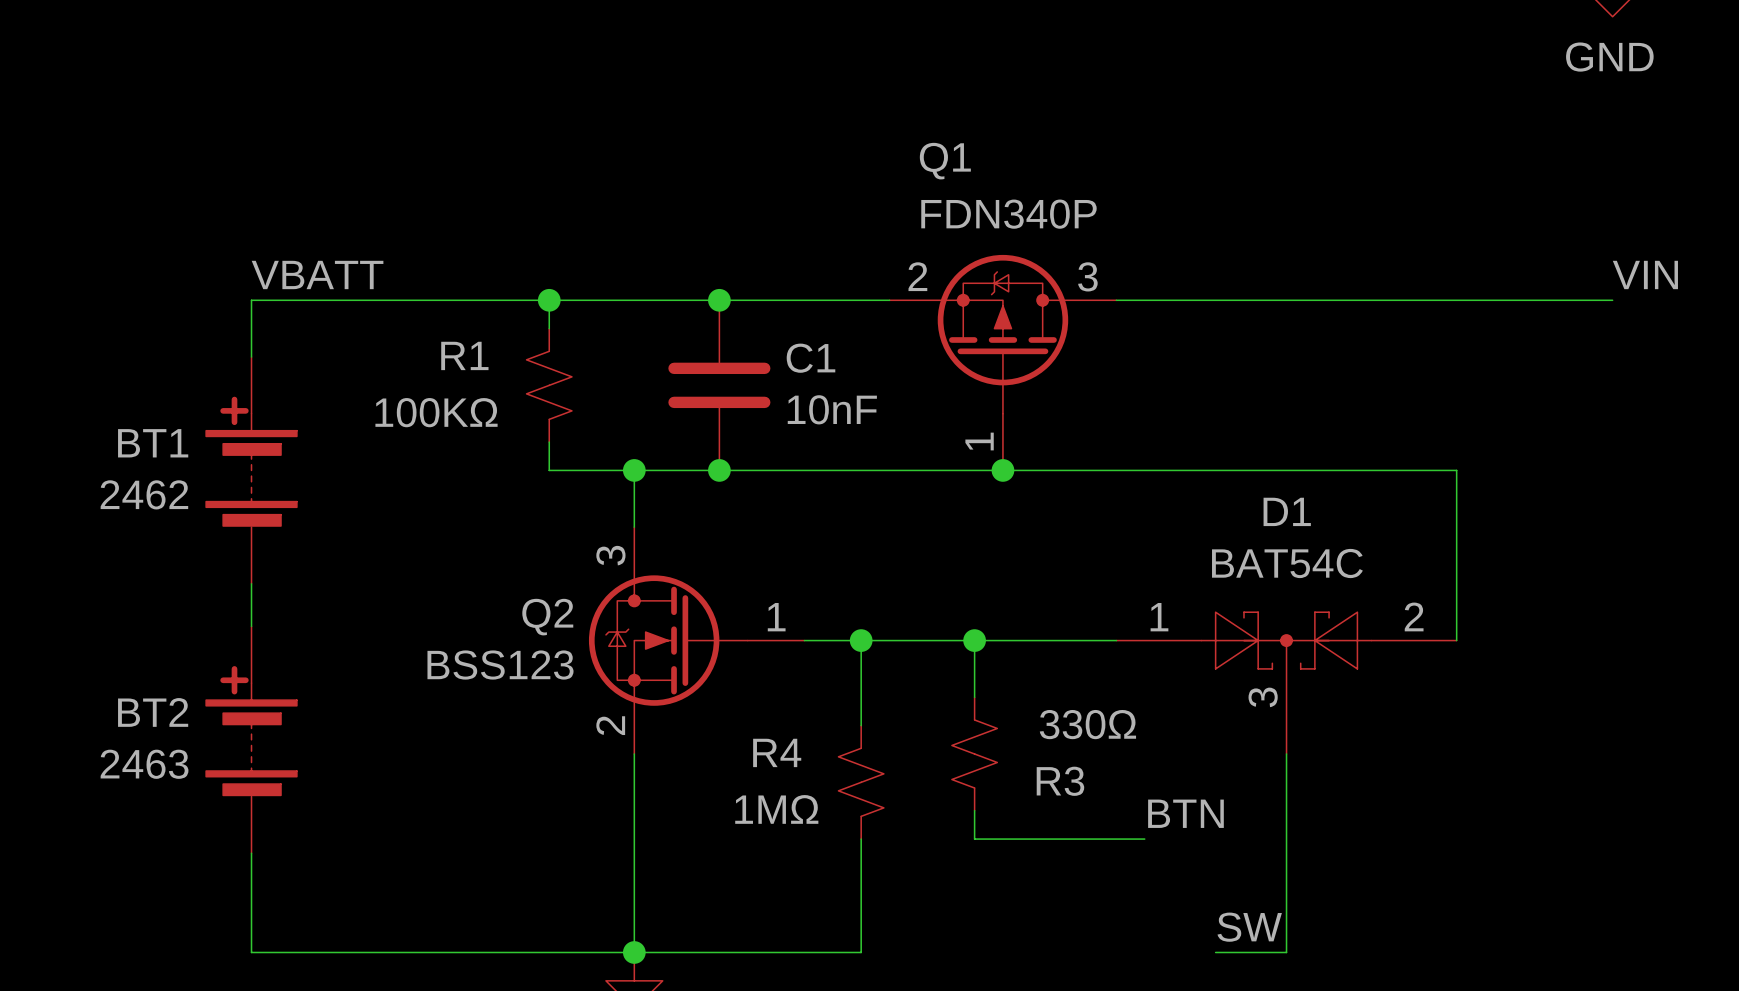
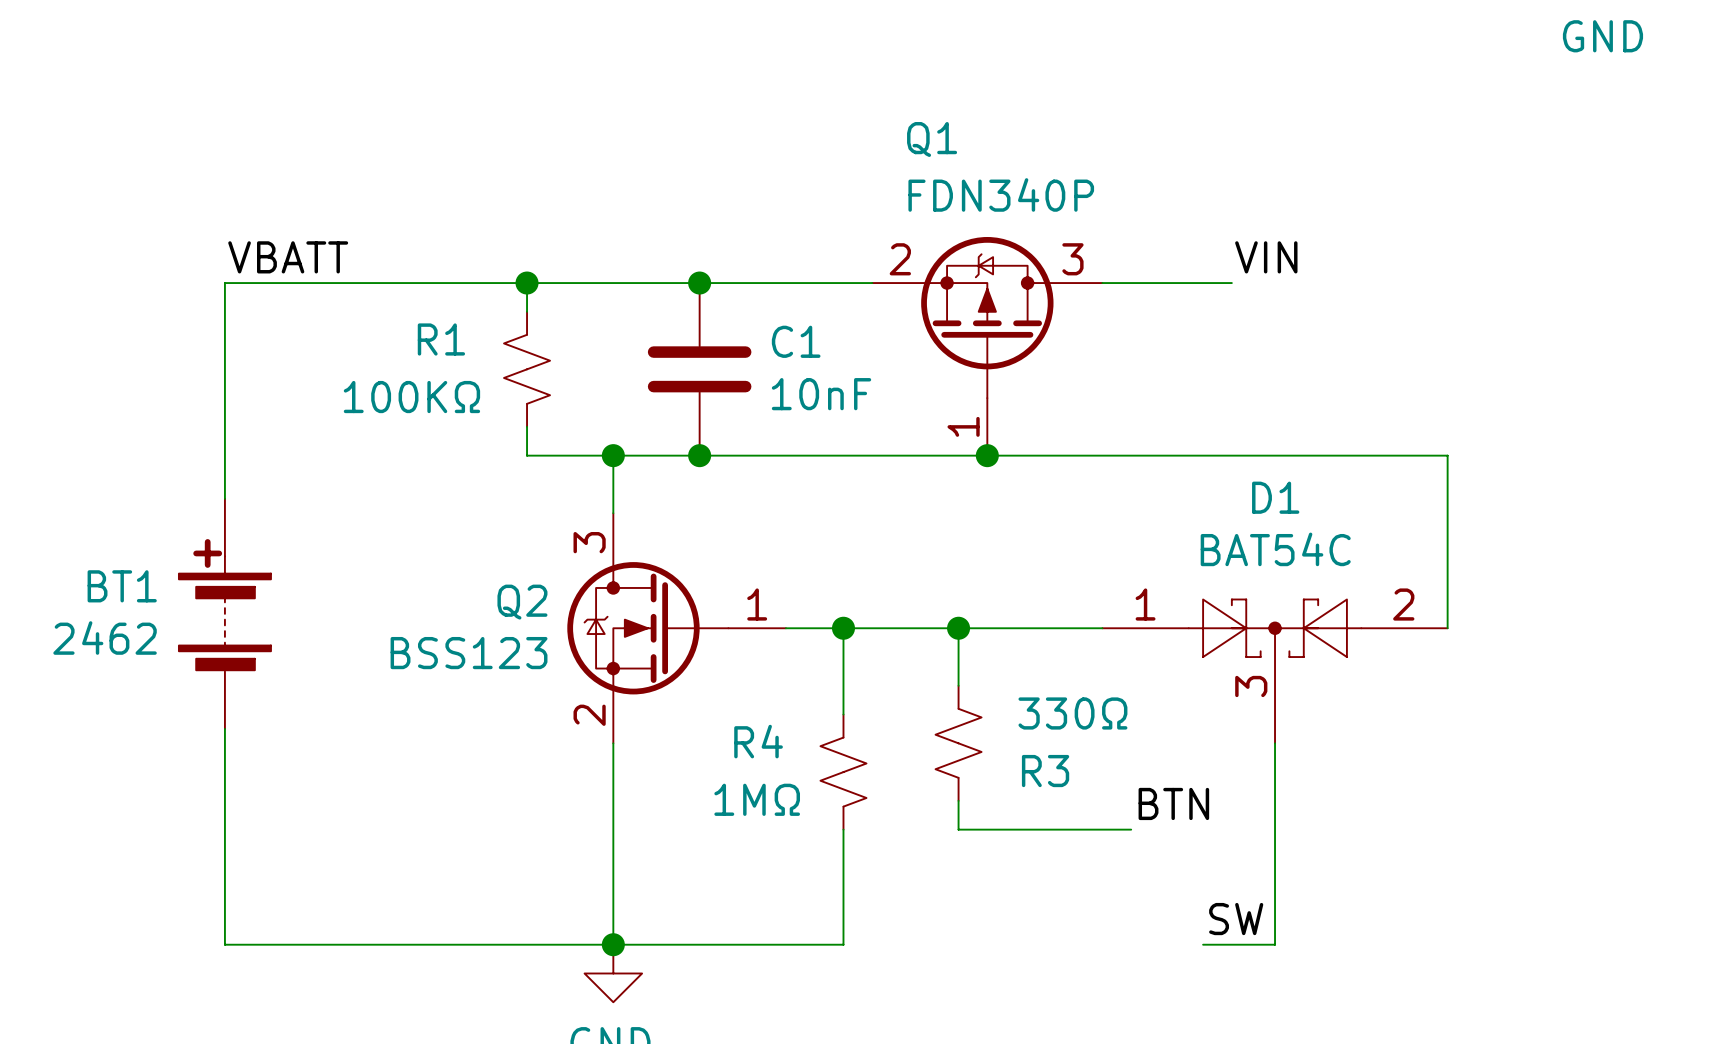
label position: VIN (1645, 274) -> VIN (1266, 257)
wire: (1243, 300) (1612, 300) -> none
BT1 position: (251, 470) -> (224, 613)
BT2: 2463 (251, 739) -> none

